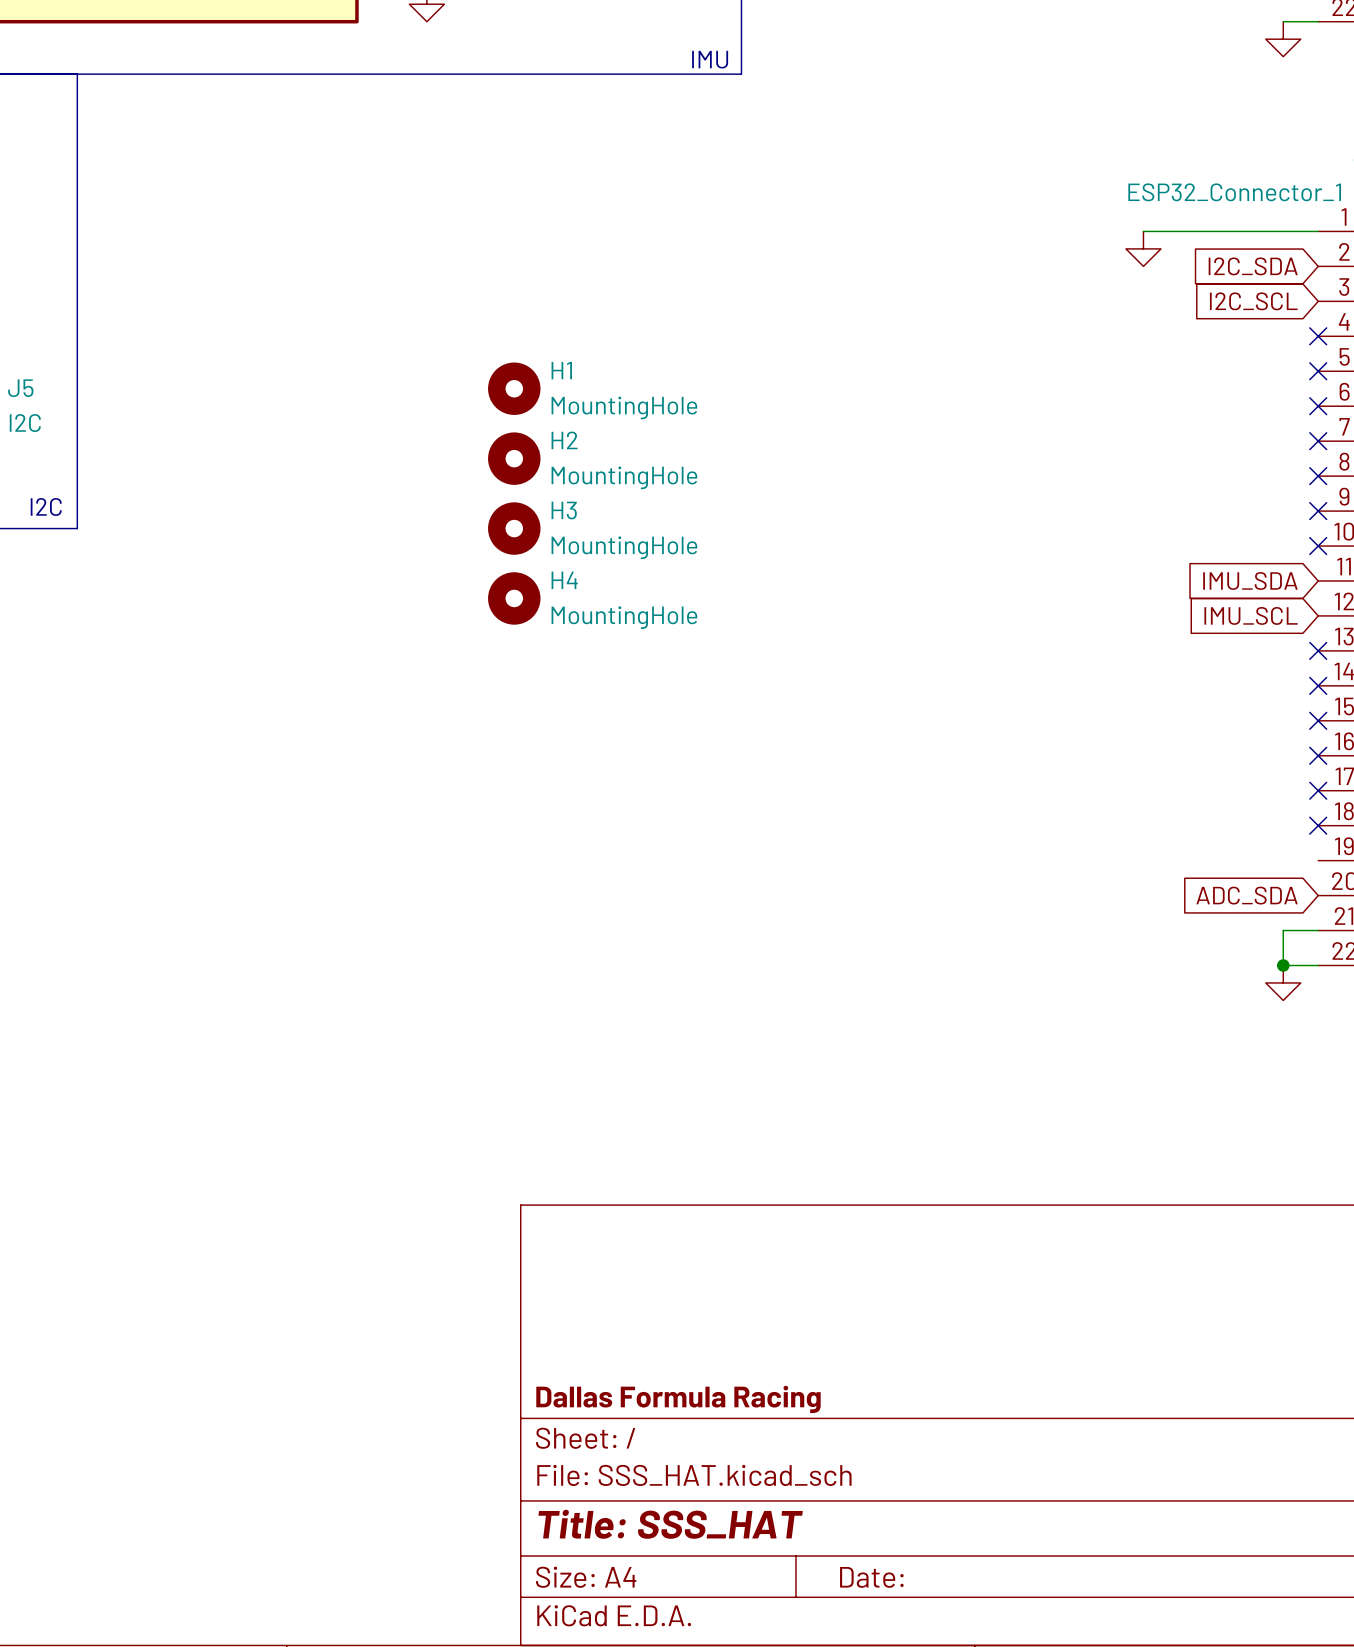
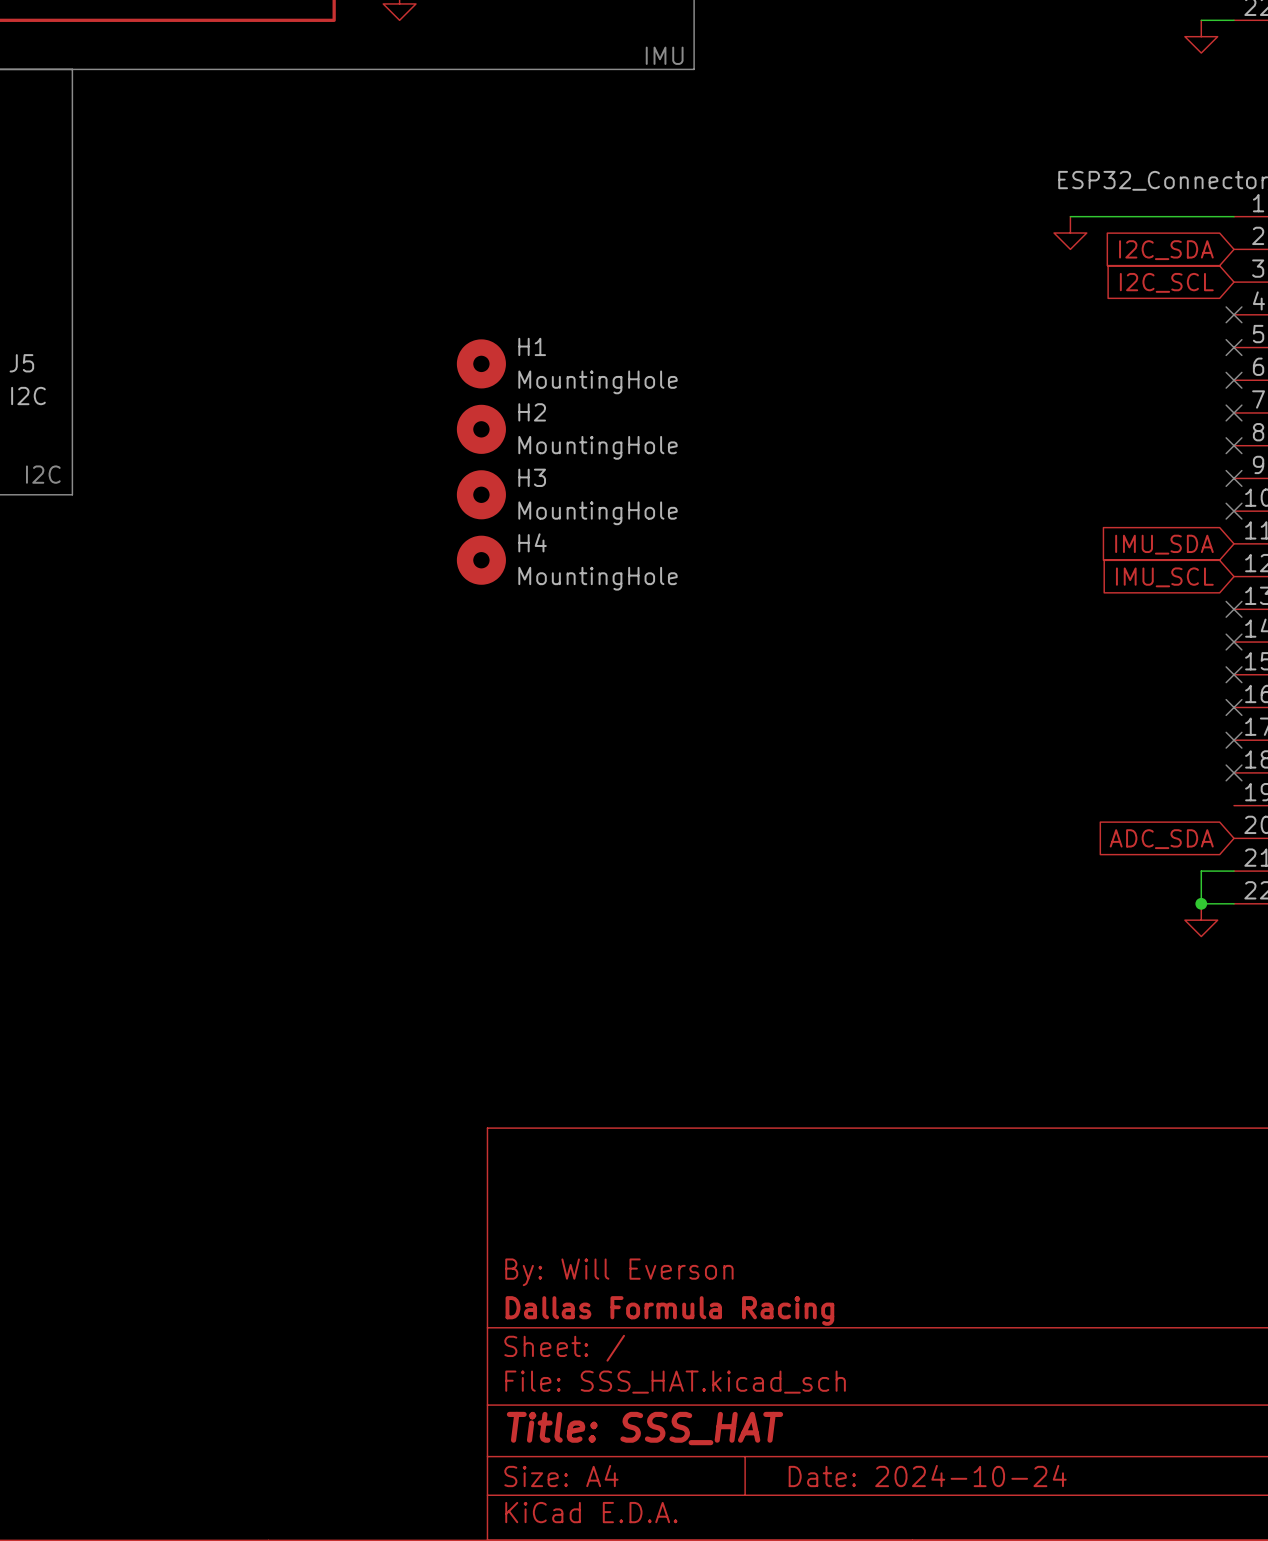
title block: none -> By: Will Everson (619, 1272)
title block: Date: (871, 1577) -> Date: 2024-10-24 (927, 1476)

